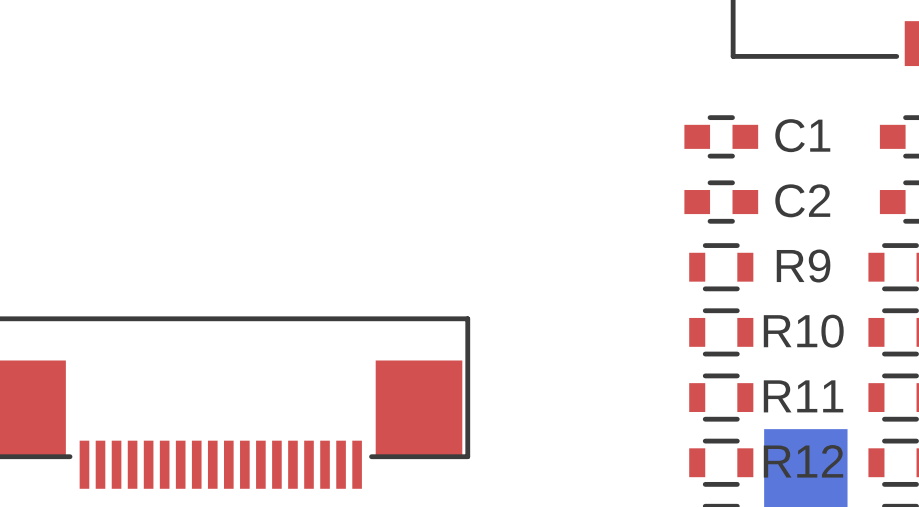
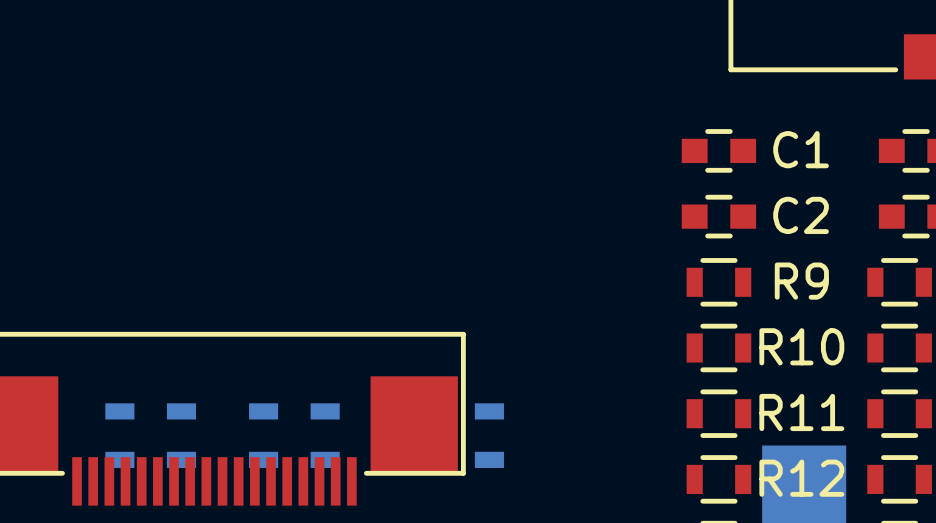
part: none -> (119, 435)
part: none -> (181, 435)
part: none -> (263, 435)
part: none -> (325, 435)
part: none -> (489, 435)

